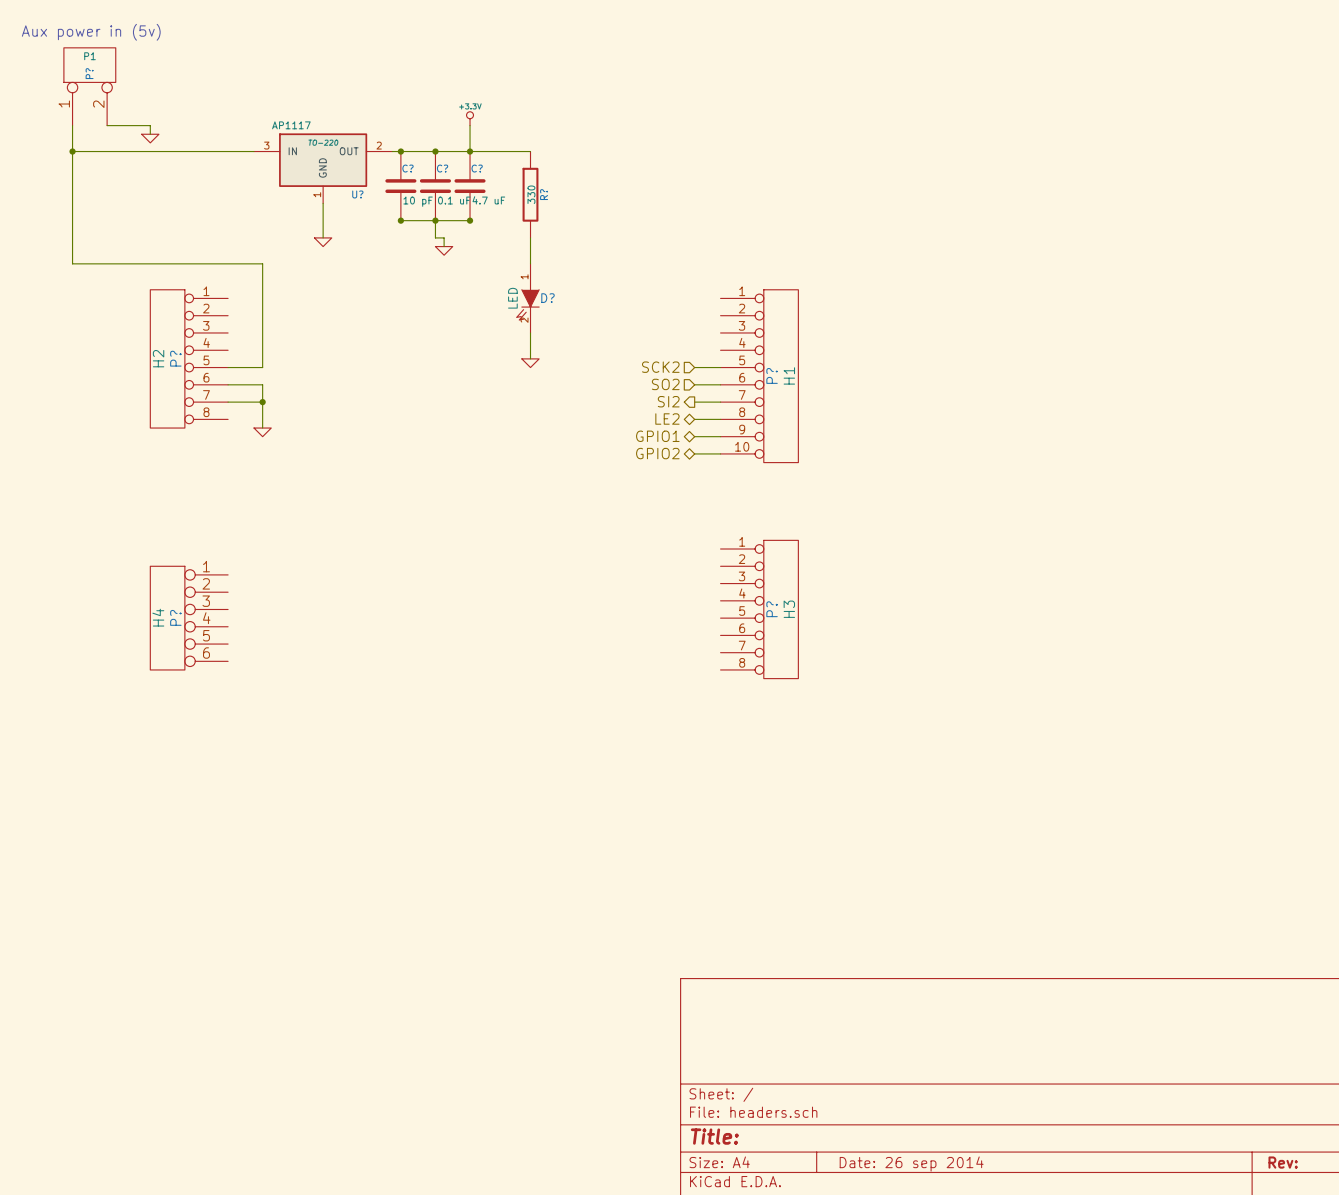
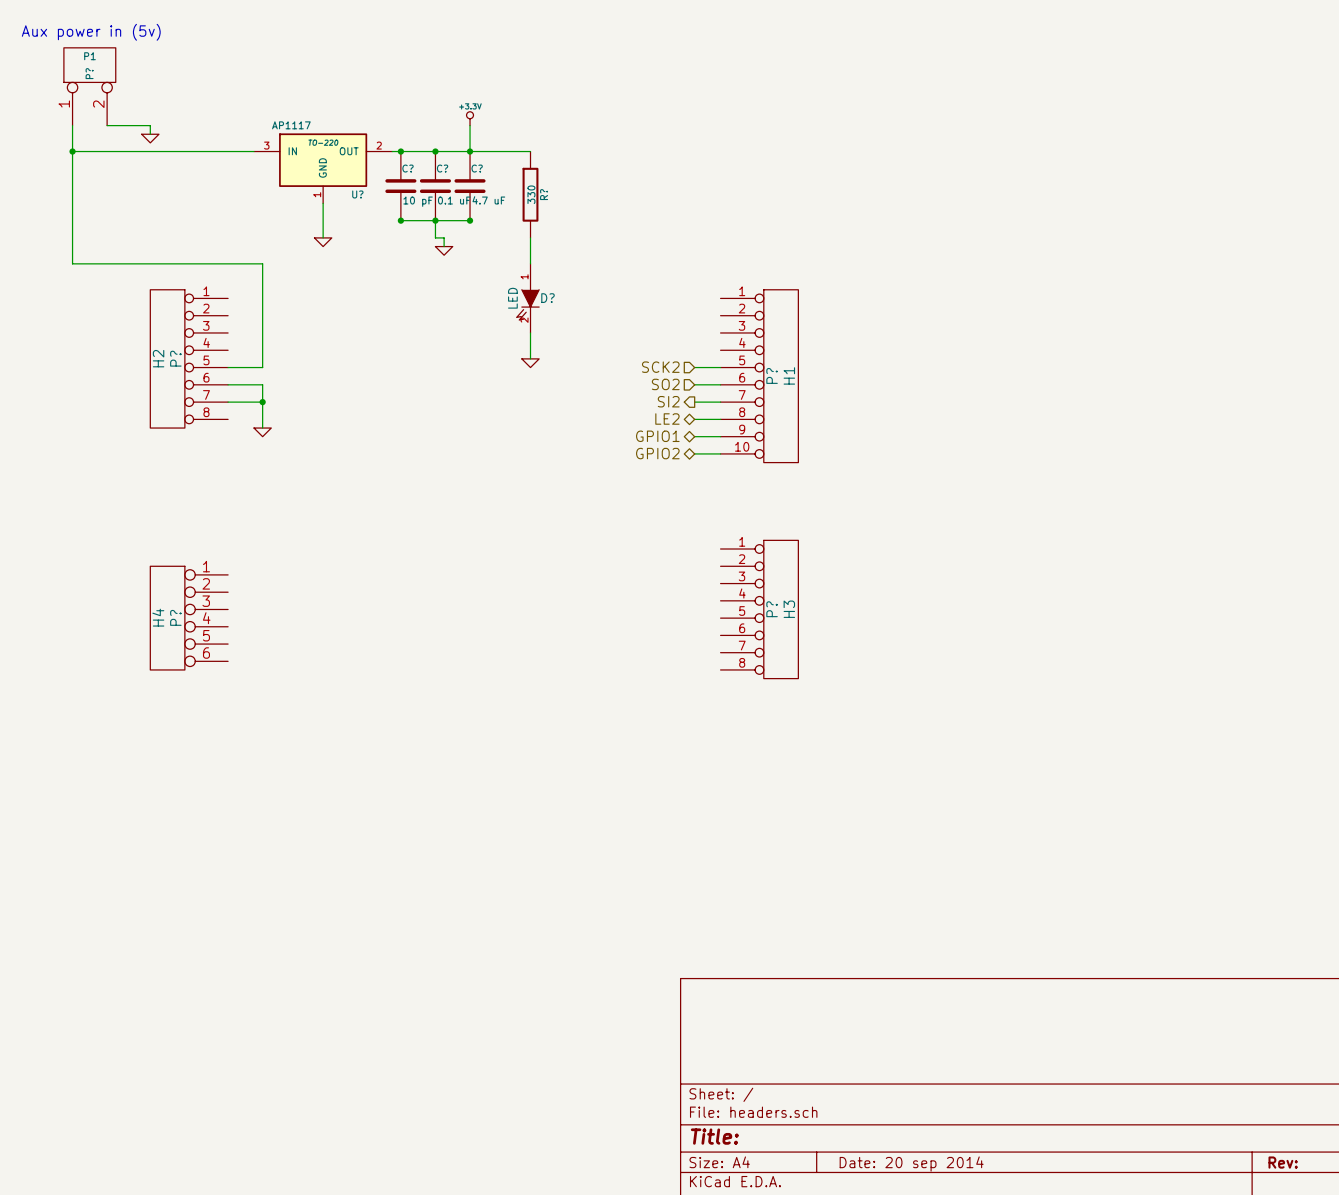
title block: Date: 26 sep 2014 (911, 1164) -> Date: 20 sep 2014 (911, 1164)

